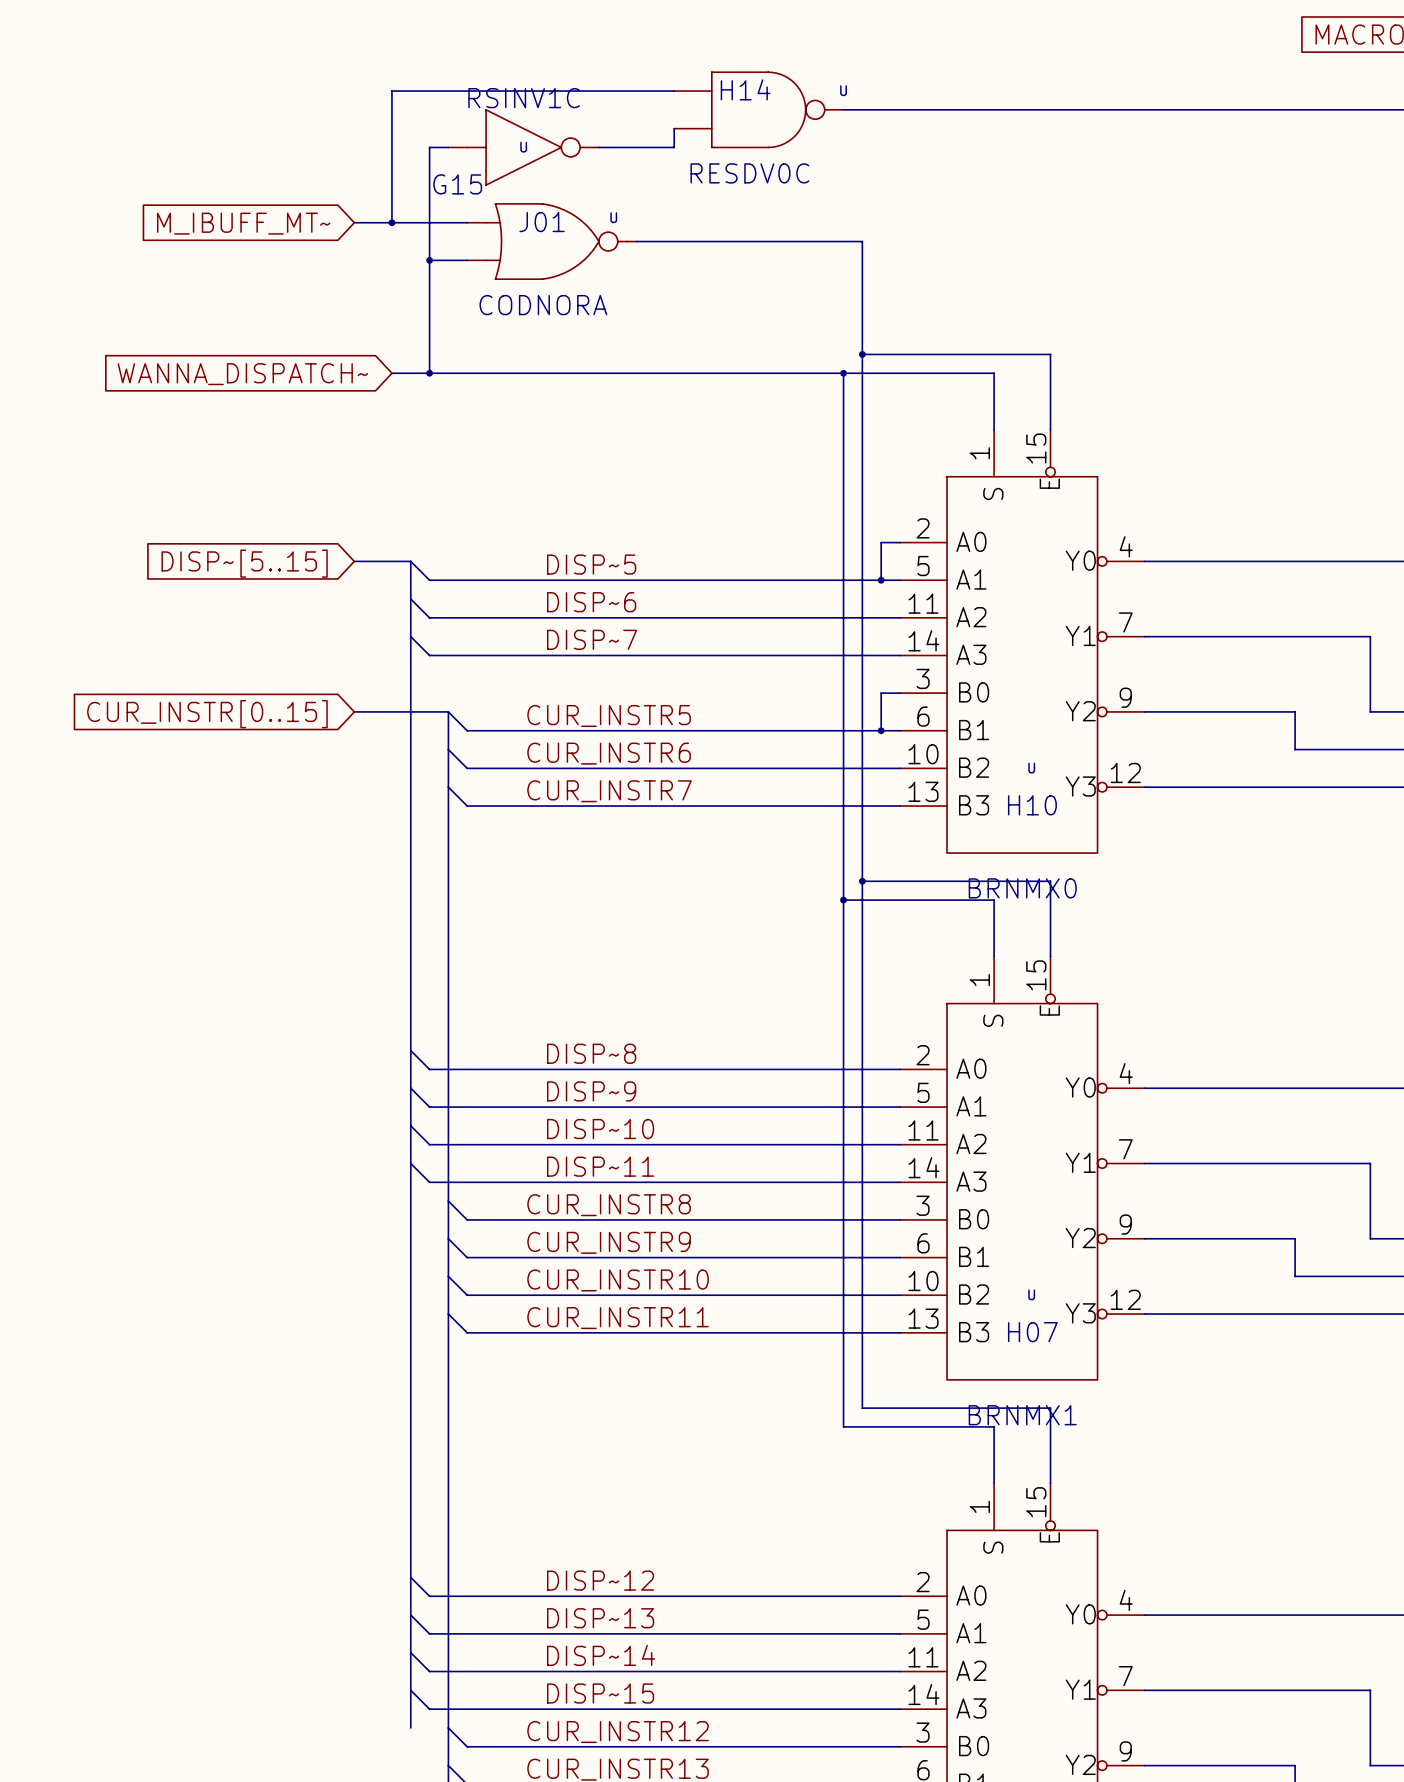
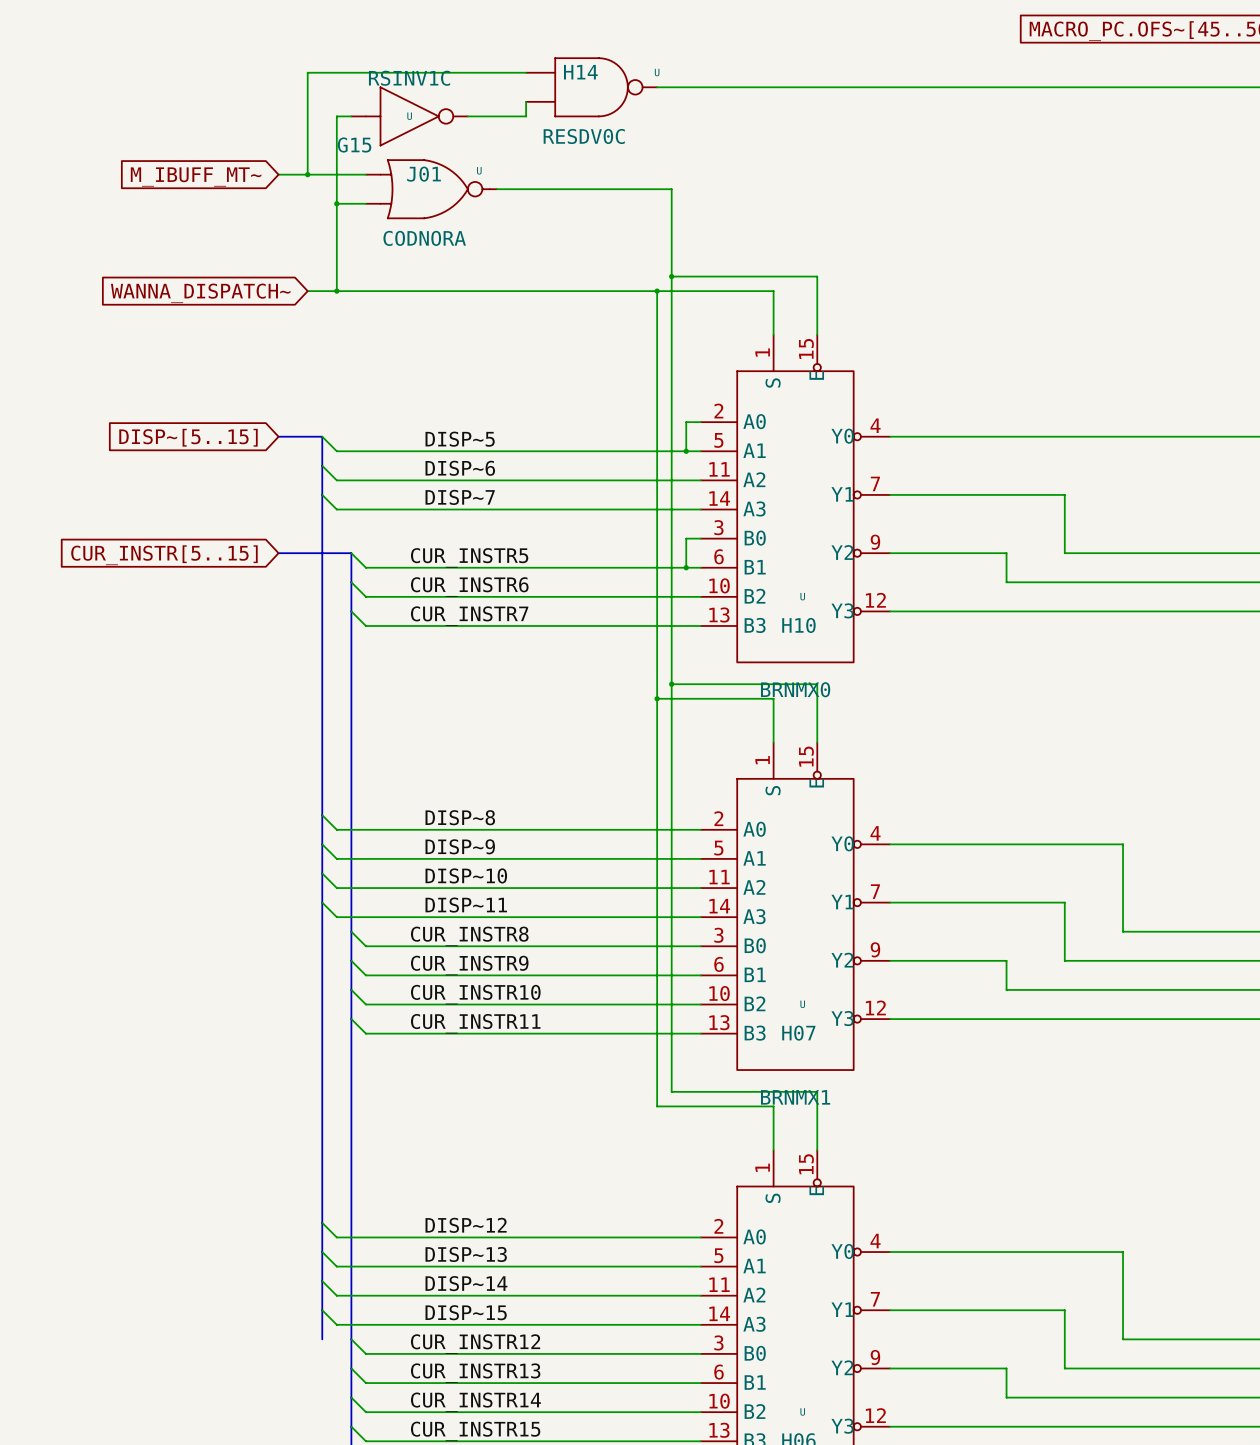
global label: CUR_INSTR[0..15] (207, 714) -> CUR_INSTR[5..15] (164, 555)

